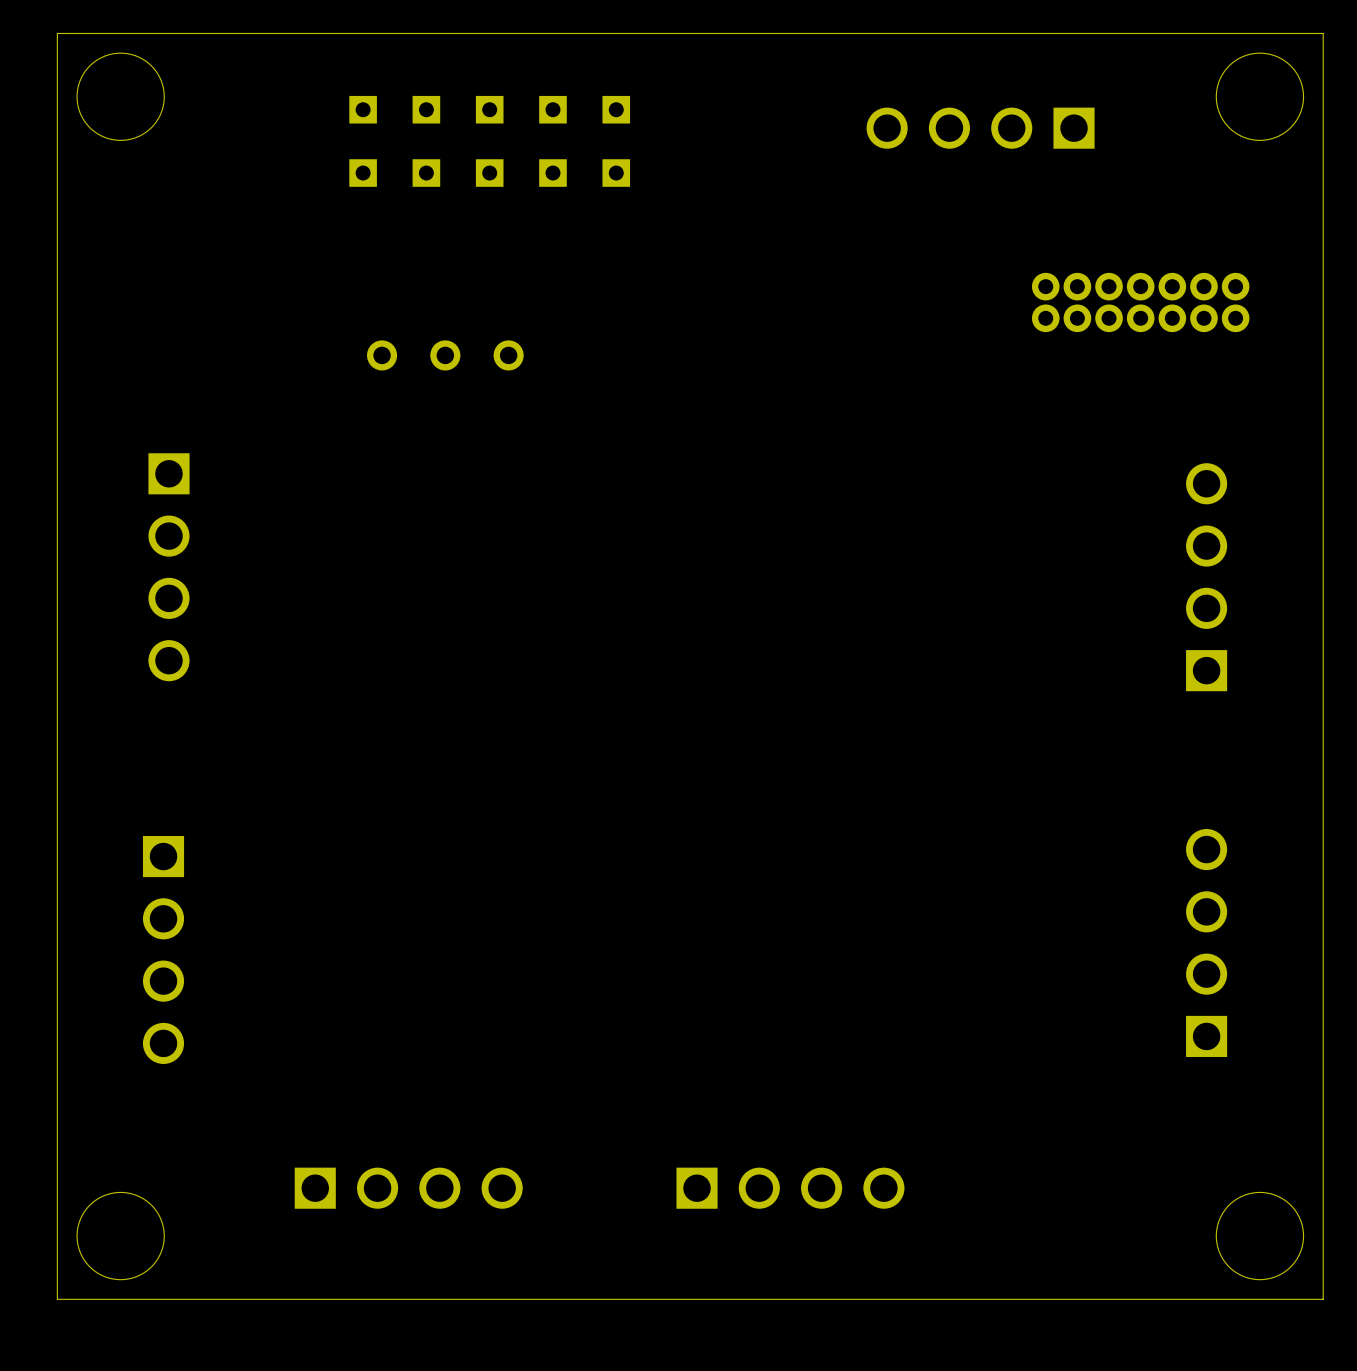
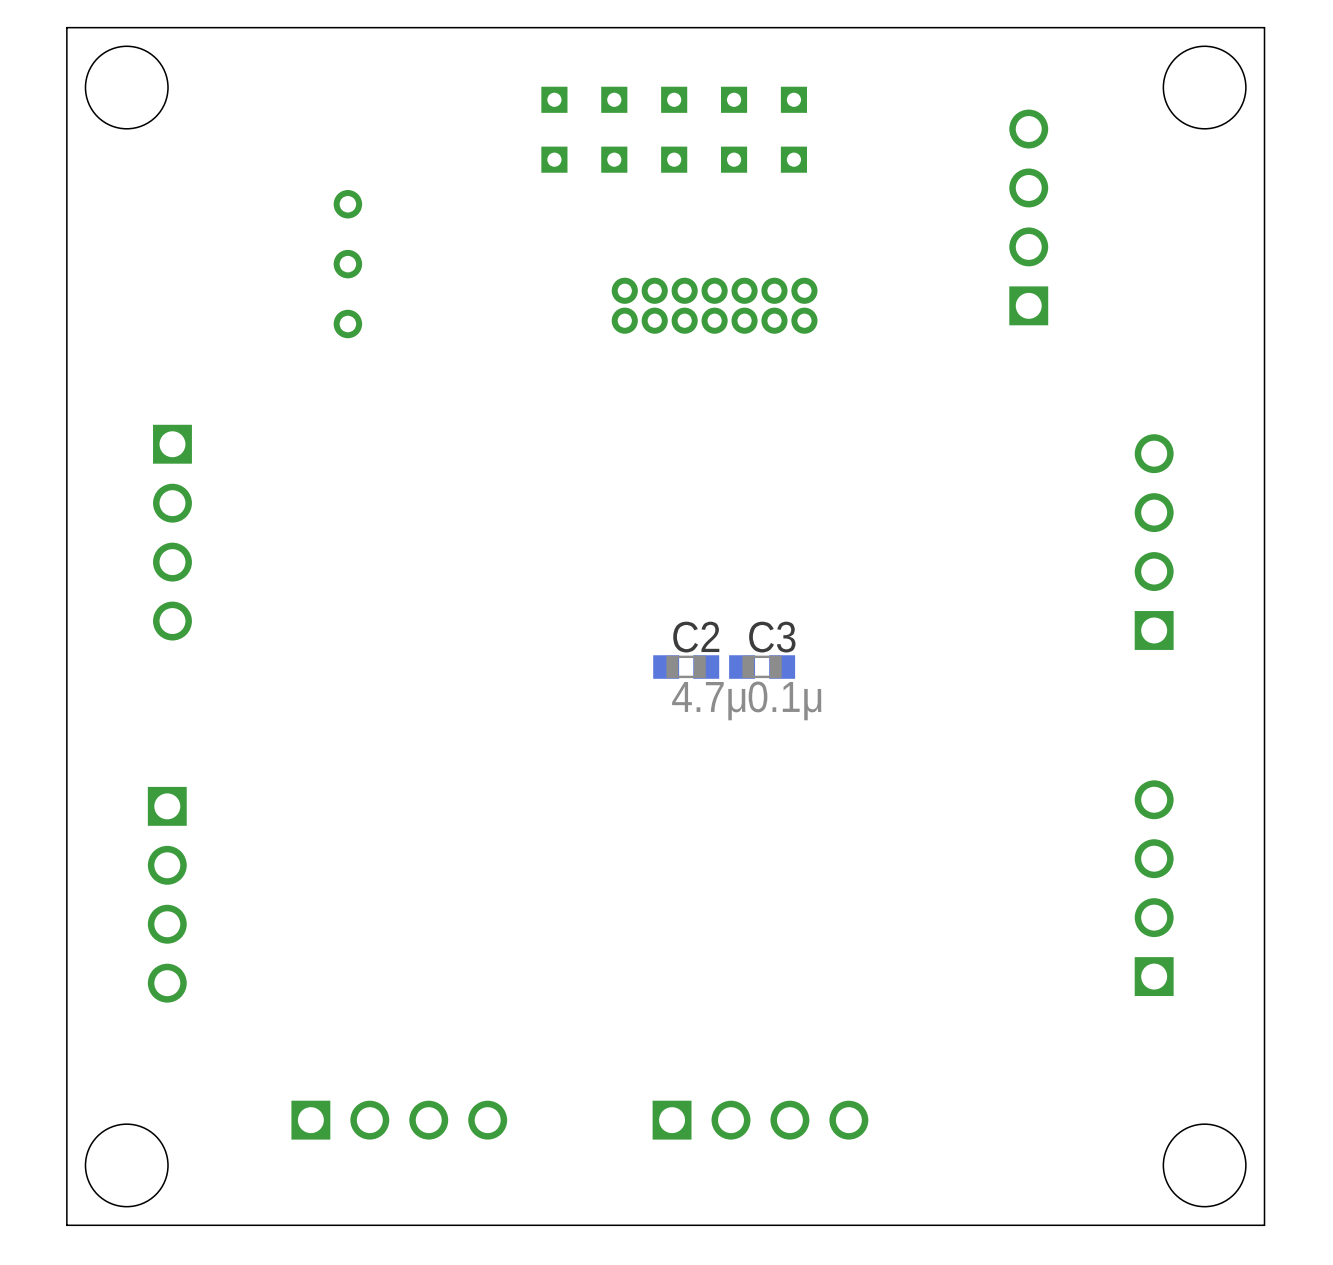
part rotation: 0° (980, 128) -> 90° clockwise (1028, 217)
part position: (980, 128) -> (1028, 217)
part position: (489, 141) -> (674, 129)
part position: (1140, 302) -> (714, 305)
part rotation: 0° (445, 355) -> 90° clockwise (347, 264)
part position: (445, 355) -> (347, 264)
C2: none -> 4.7μ (686, 667)
C3: none -> 0.1μ (762, 667)

